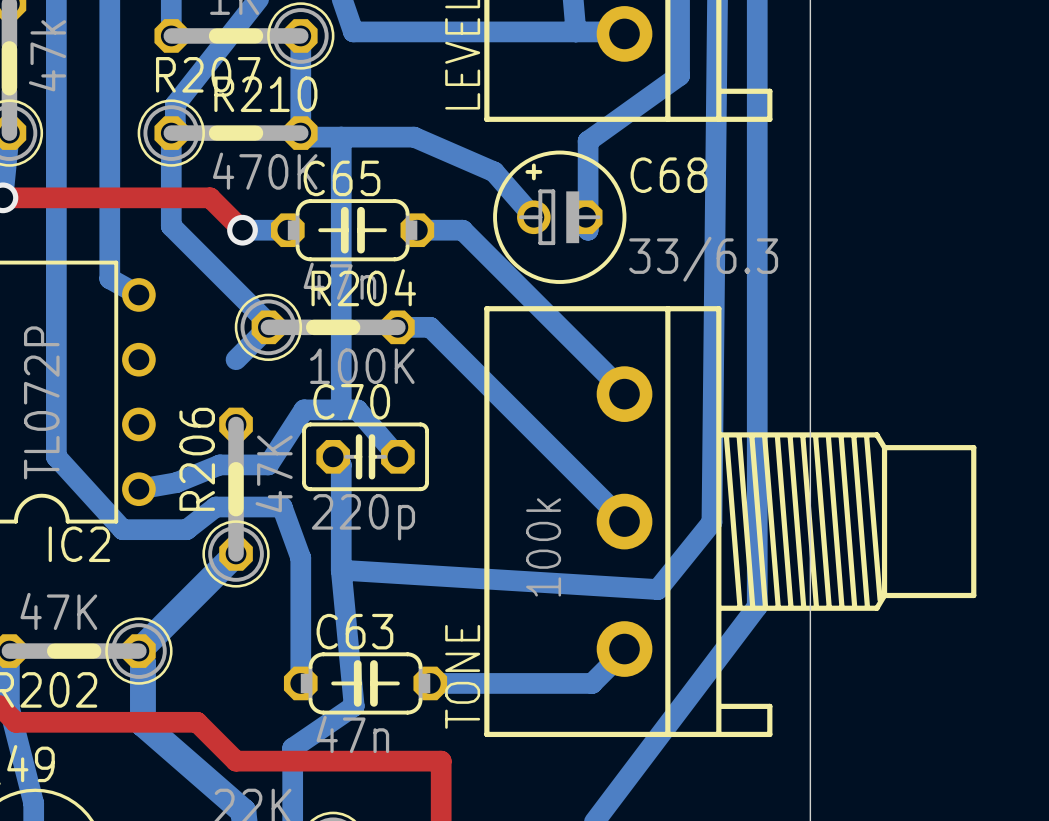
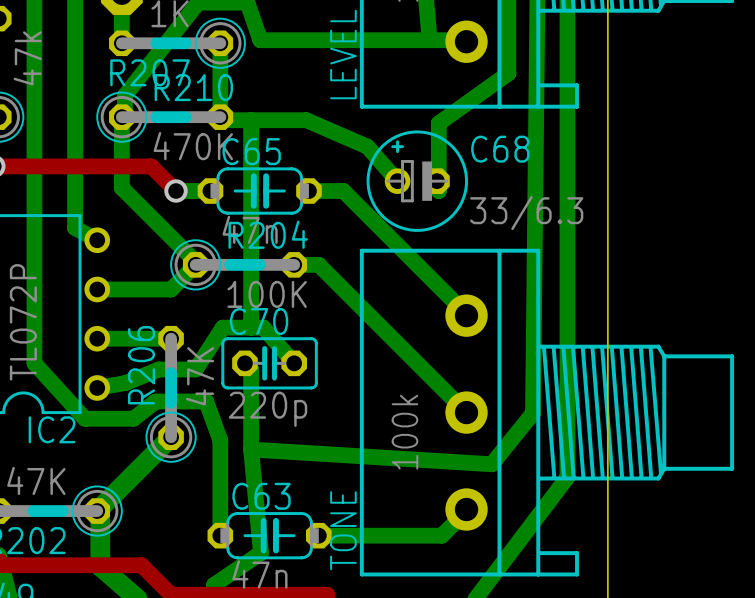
bottom track: none -> (97, 289) (171, 289)
bottom track: none -> (97, 338) (171, 338)

